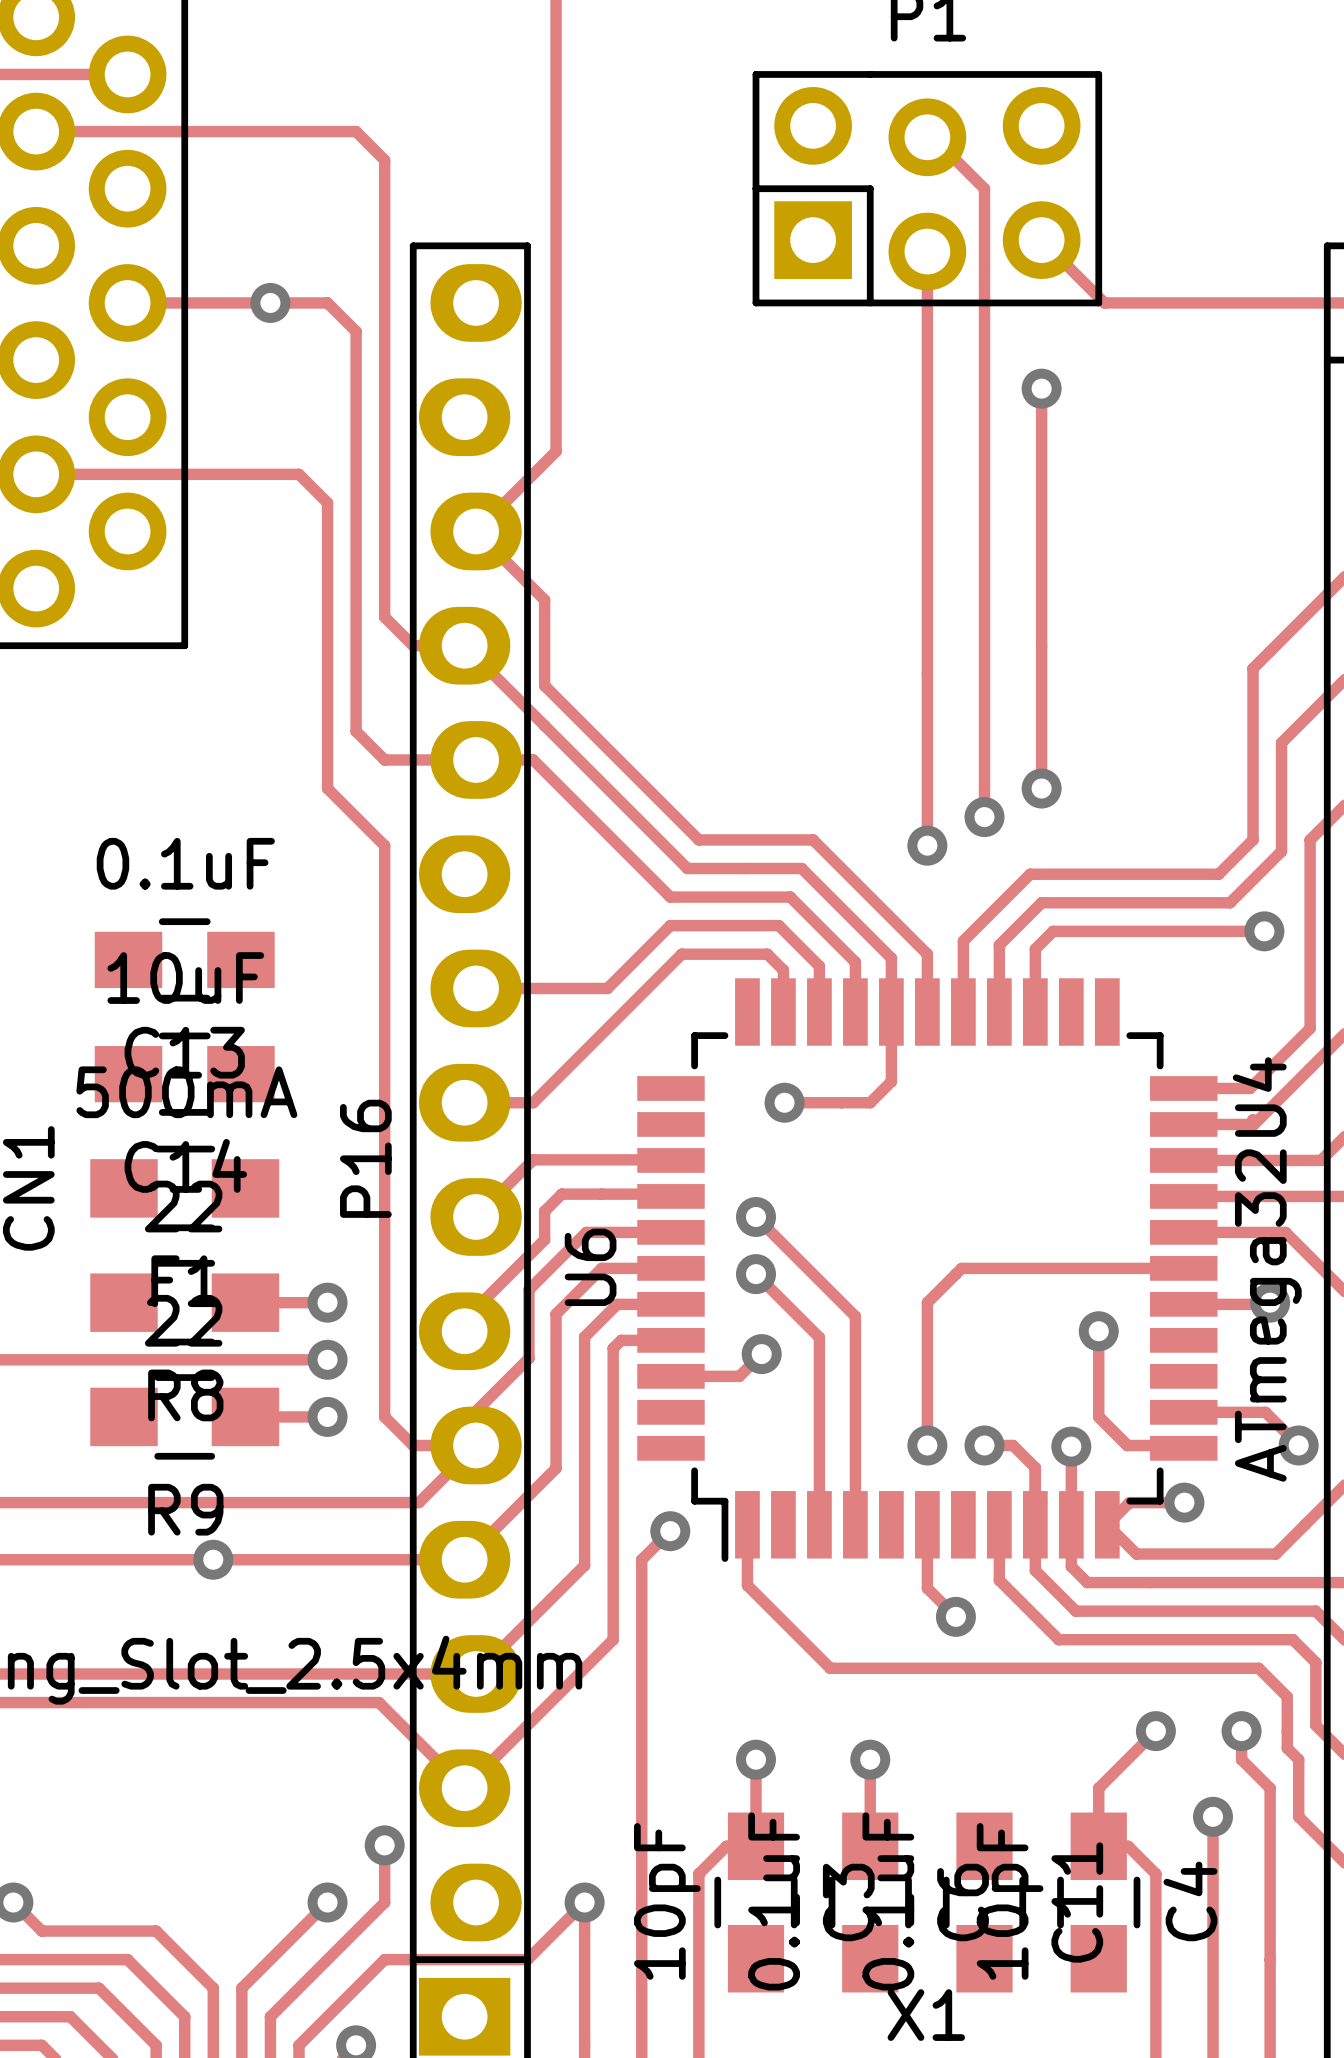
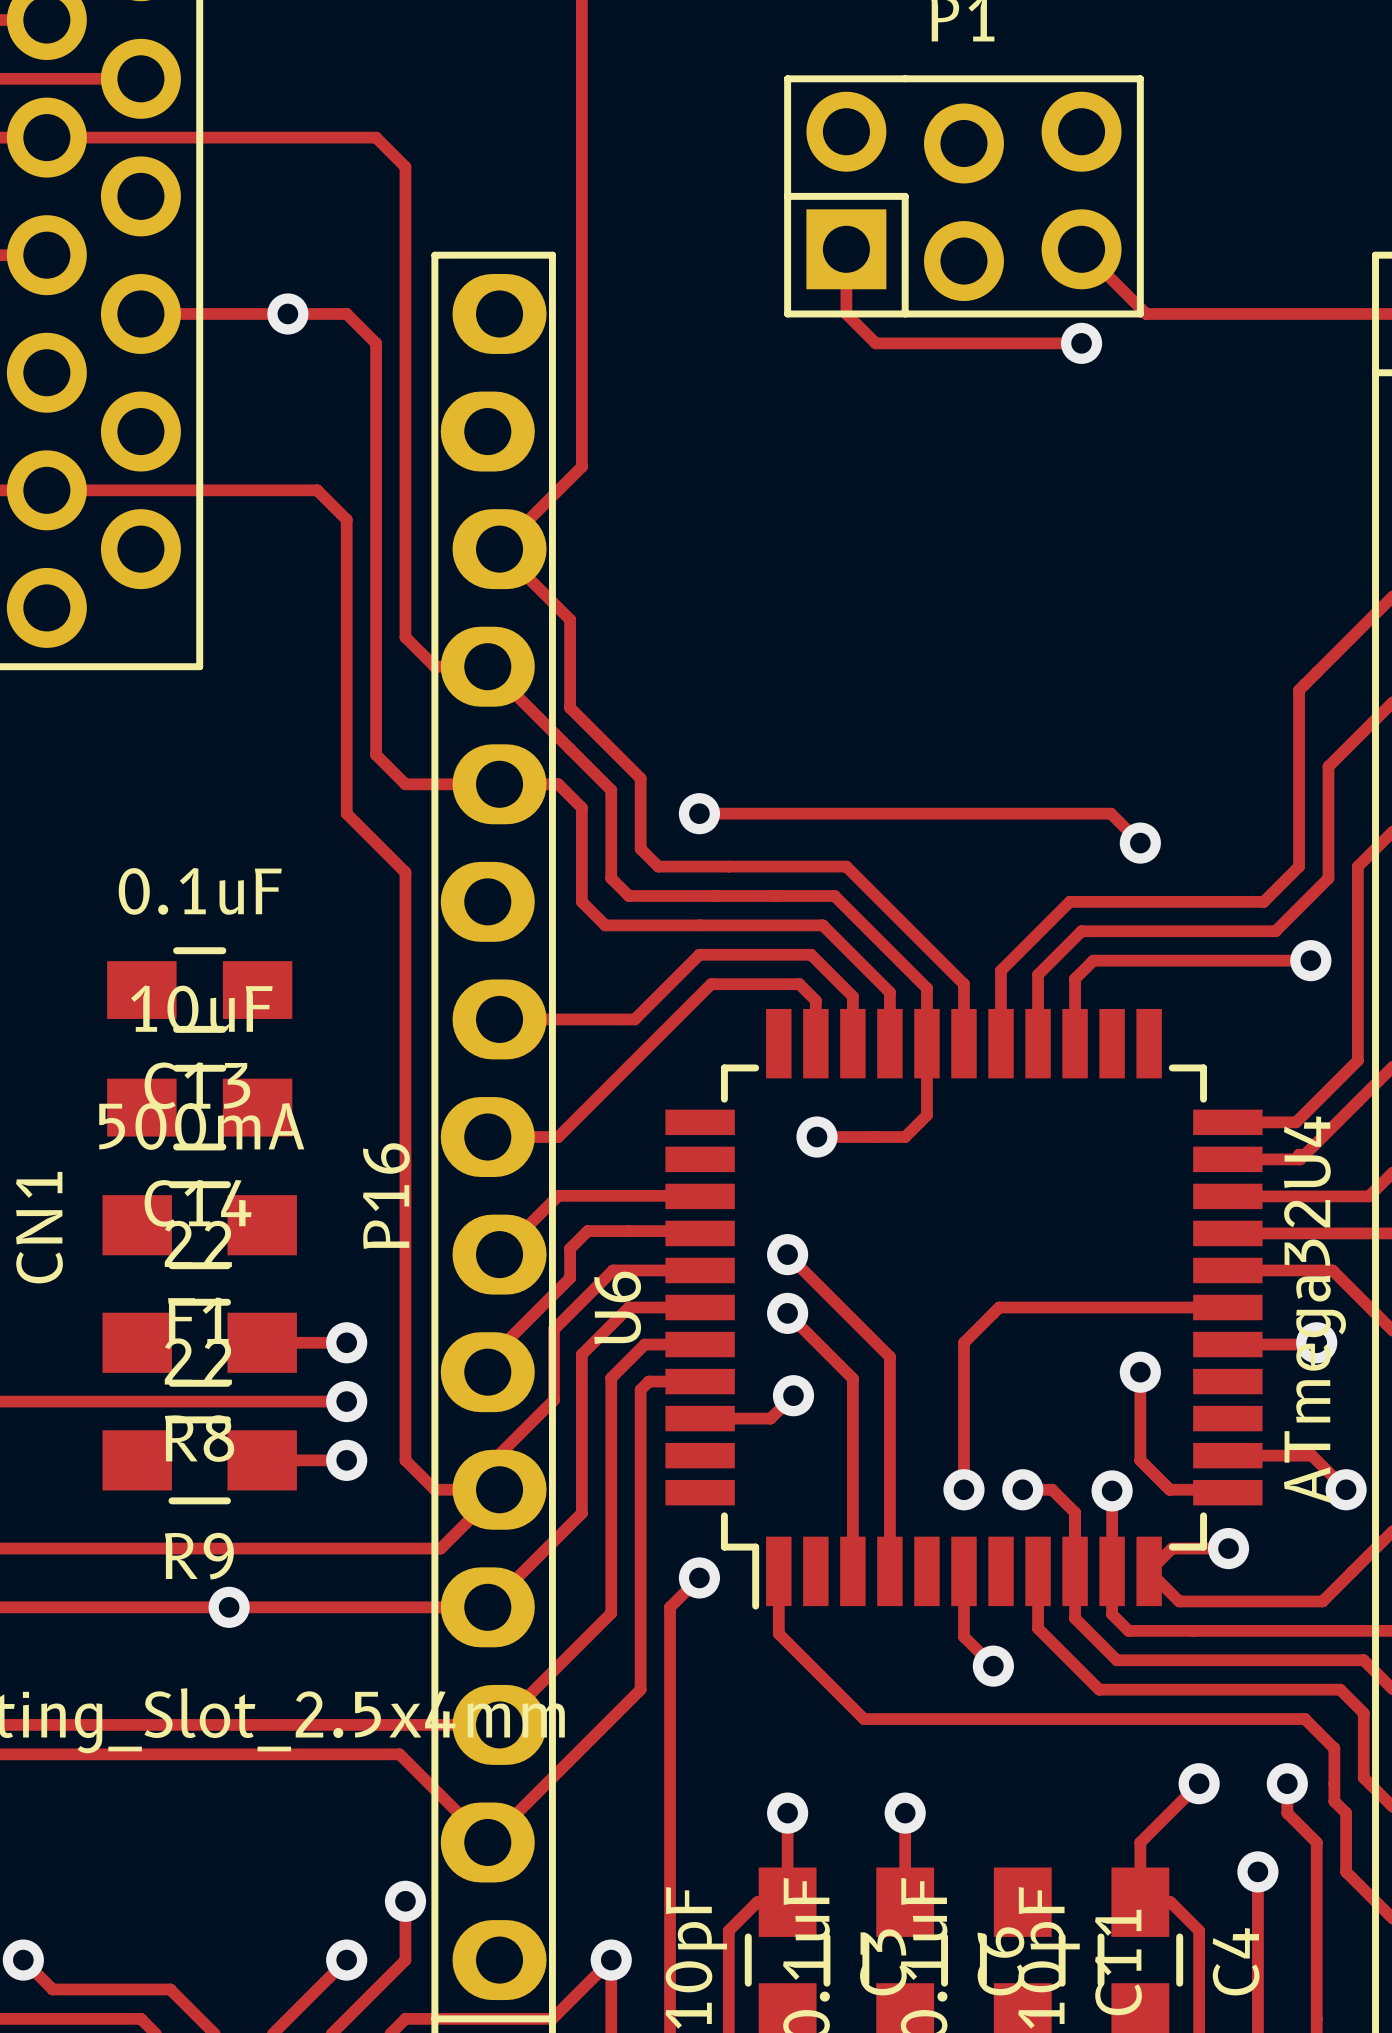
track: (933, 137) (984, 188) (984, 817) -> none
track: none -> (846, 249) (846, 313) (875, 343) (1081, 343)
track: (927, 251) (927, 845) -> none
track: (1041, 388) (1041, 788) -> none
via position: (1041, 388) -> (1081, 343)
track: (613, 754) (698, 839) -> (640, 778) (640, 848) (658, 866) (728, 866)
track: (584, 765) (687, 868) -> (611, 790) (611, 878) (628, 895) (717, 895)
track: (556, 782) (670, 897) -> (581, 807) (581, 901) (605, 925) (699, 925)
track: none -> (699, 813) (1110, 813) (1140, 843)
via: none -> (699, 813)
via: (1041, 788) -> none
via: (984, 817) -> none
via: none -> (1140, 843)
via: (927, 845) -> none

